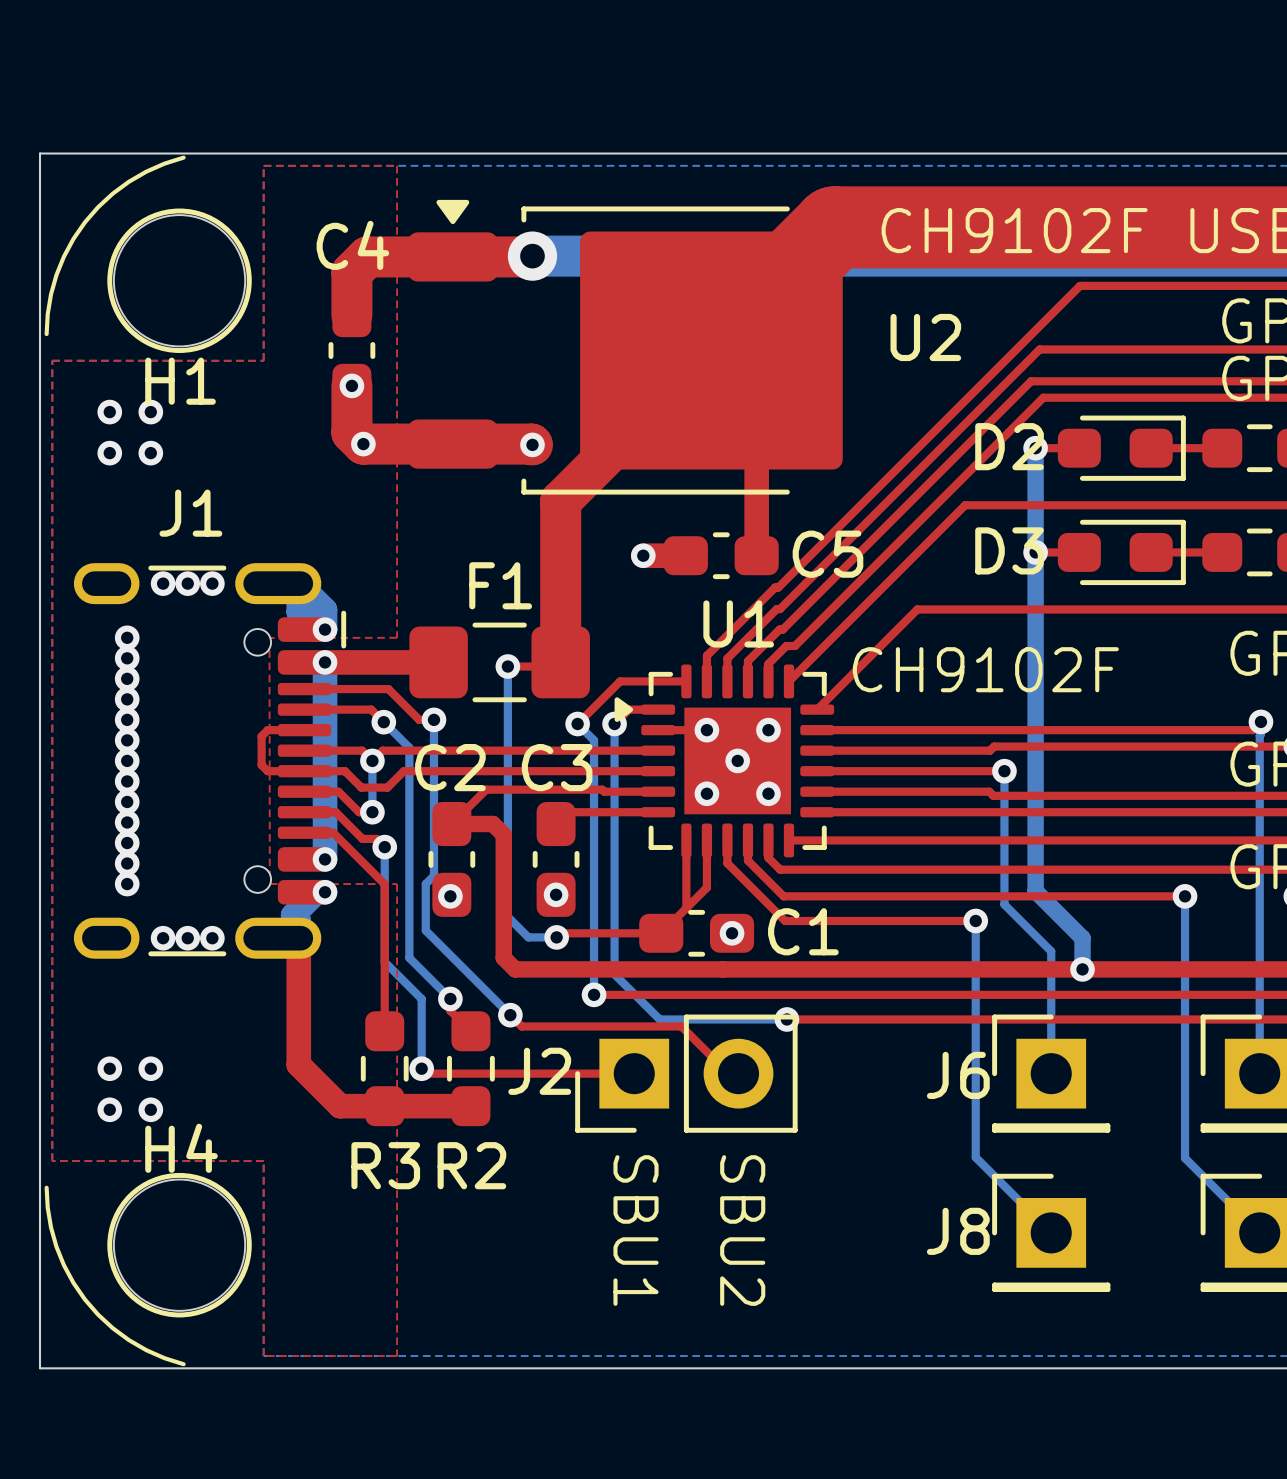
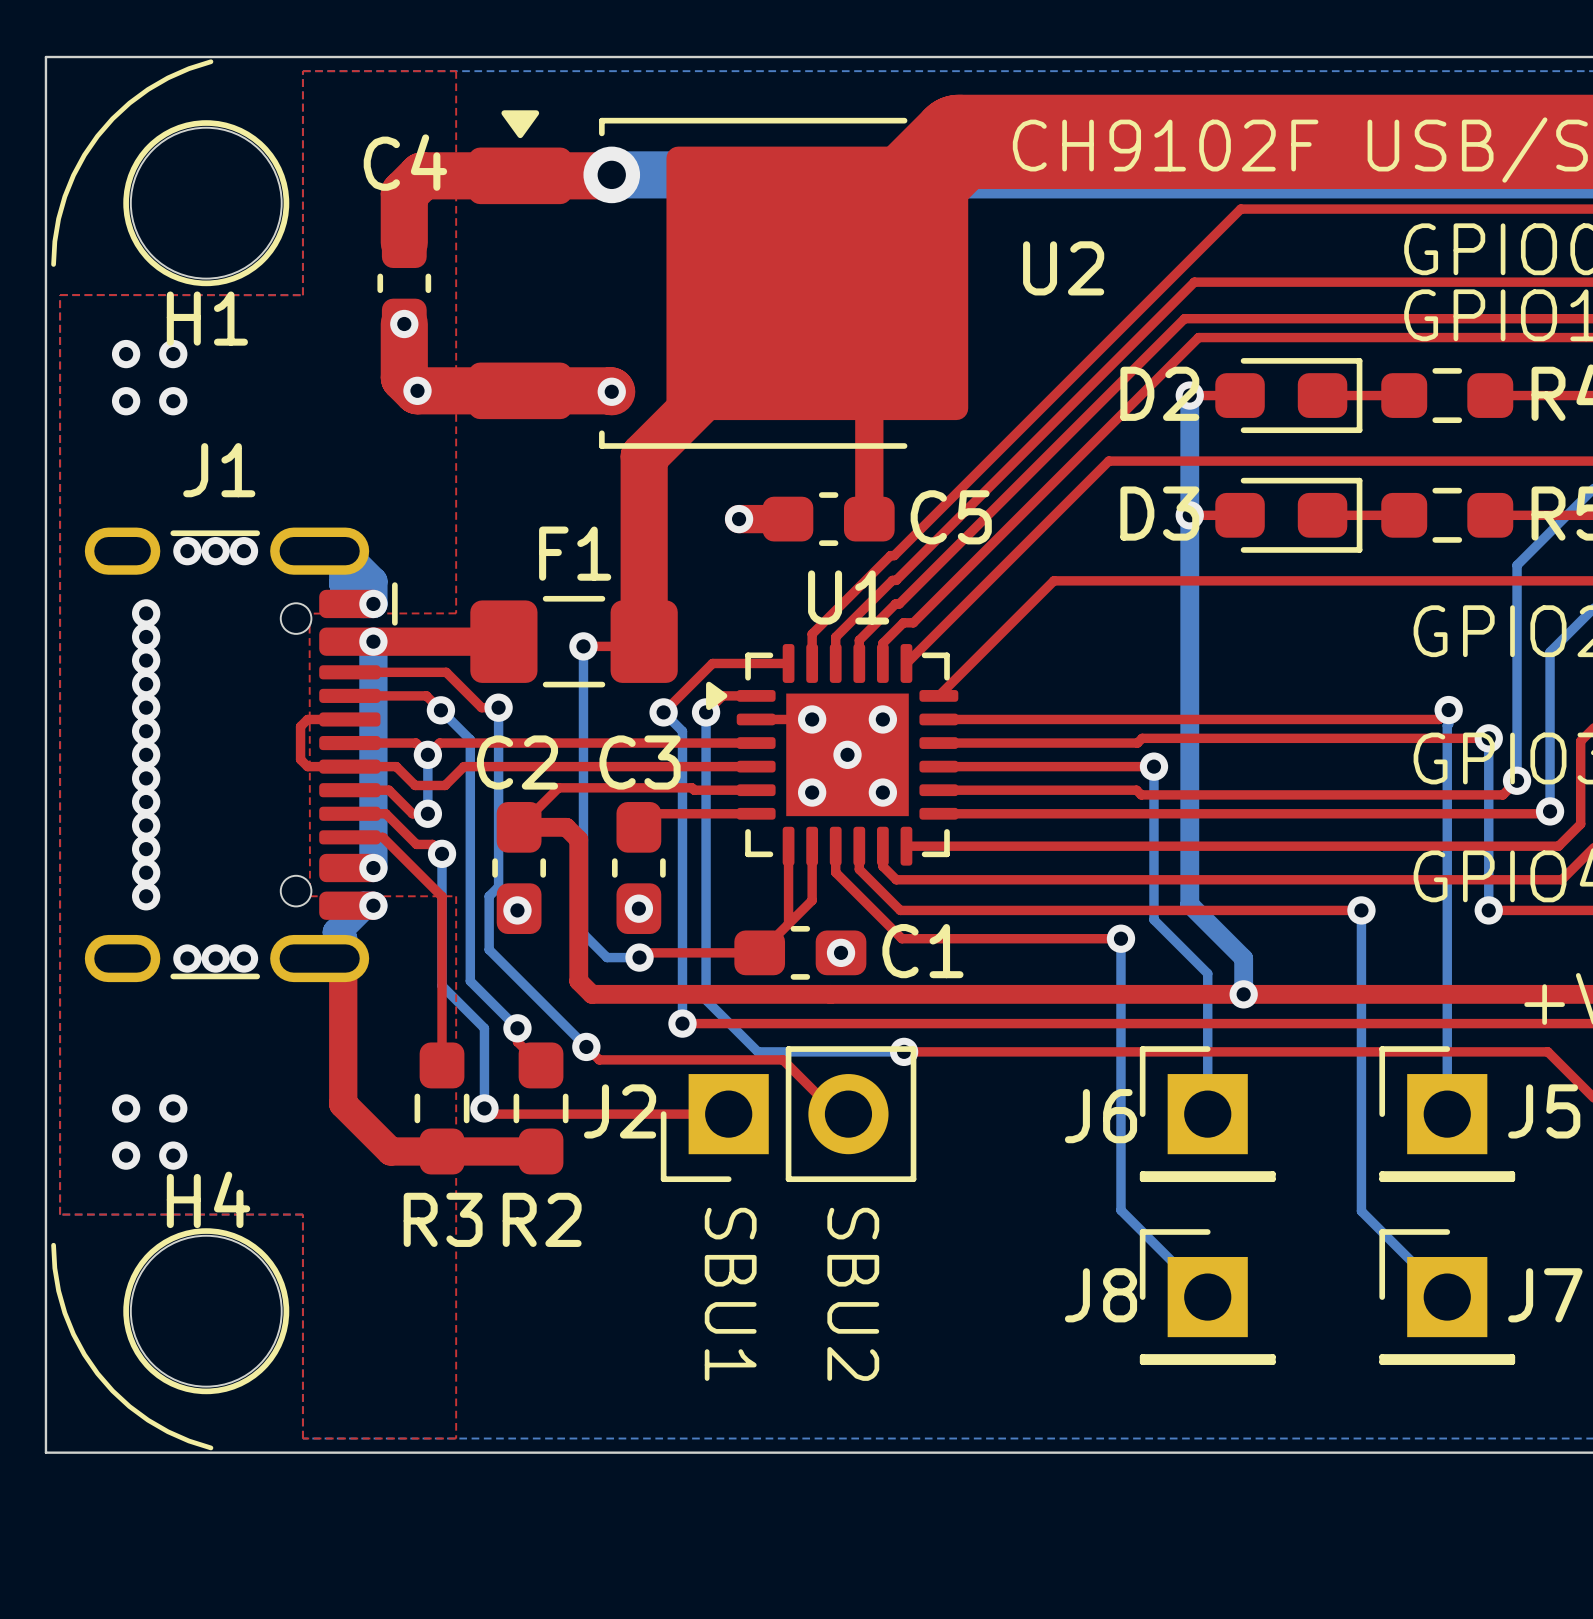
text: CH9102F (985, 669) -> none

